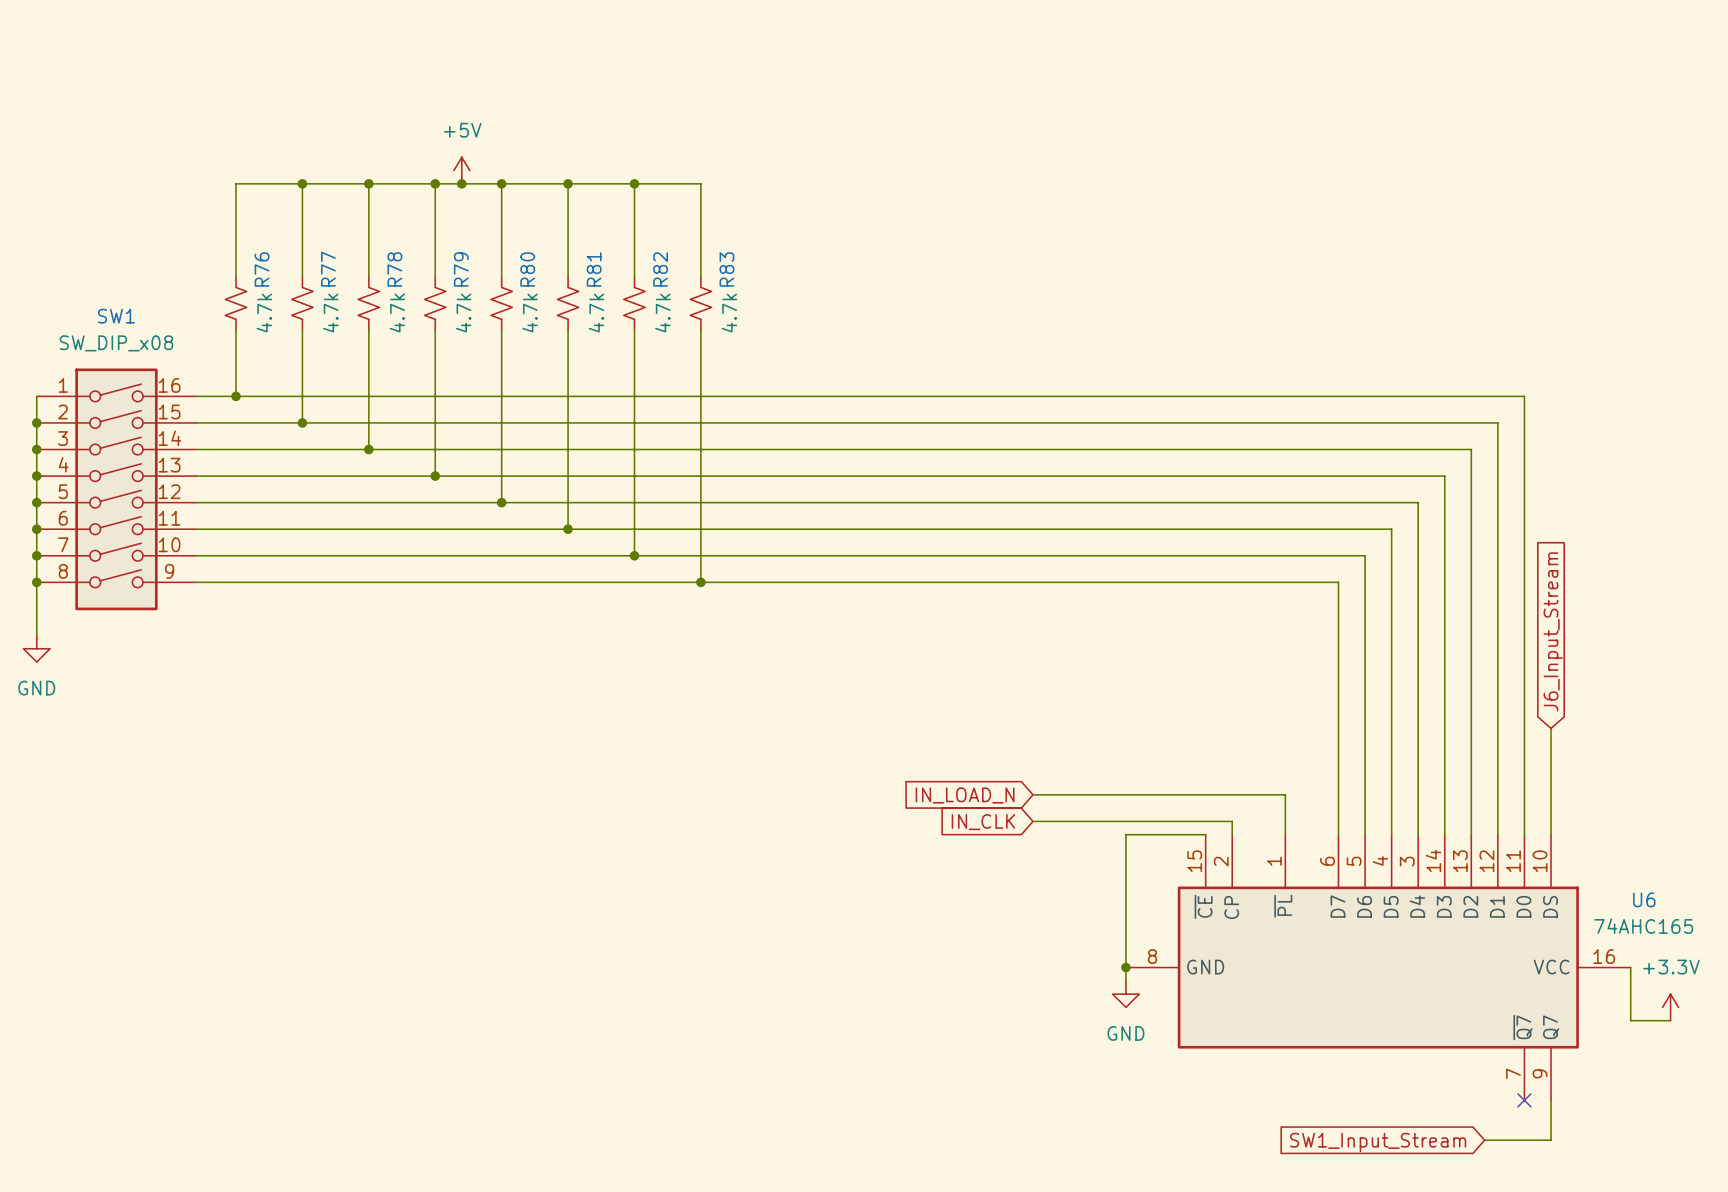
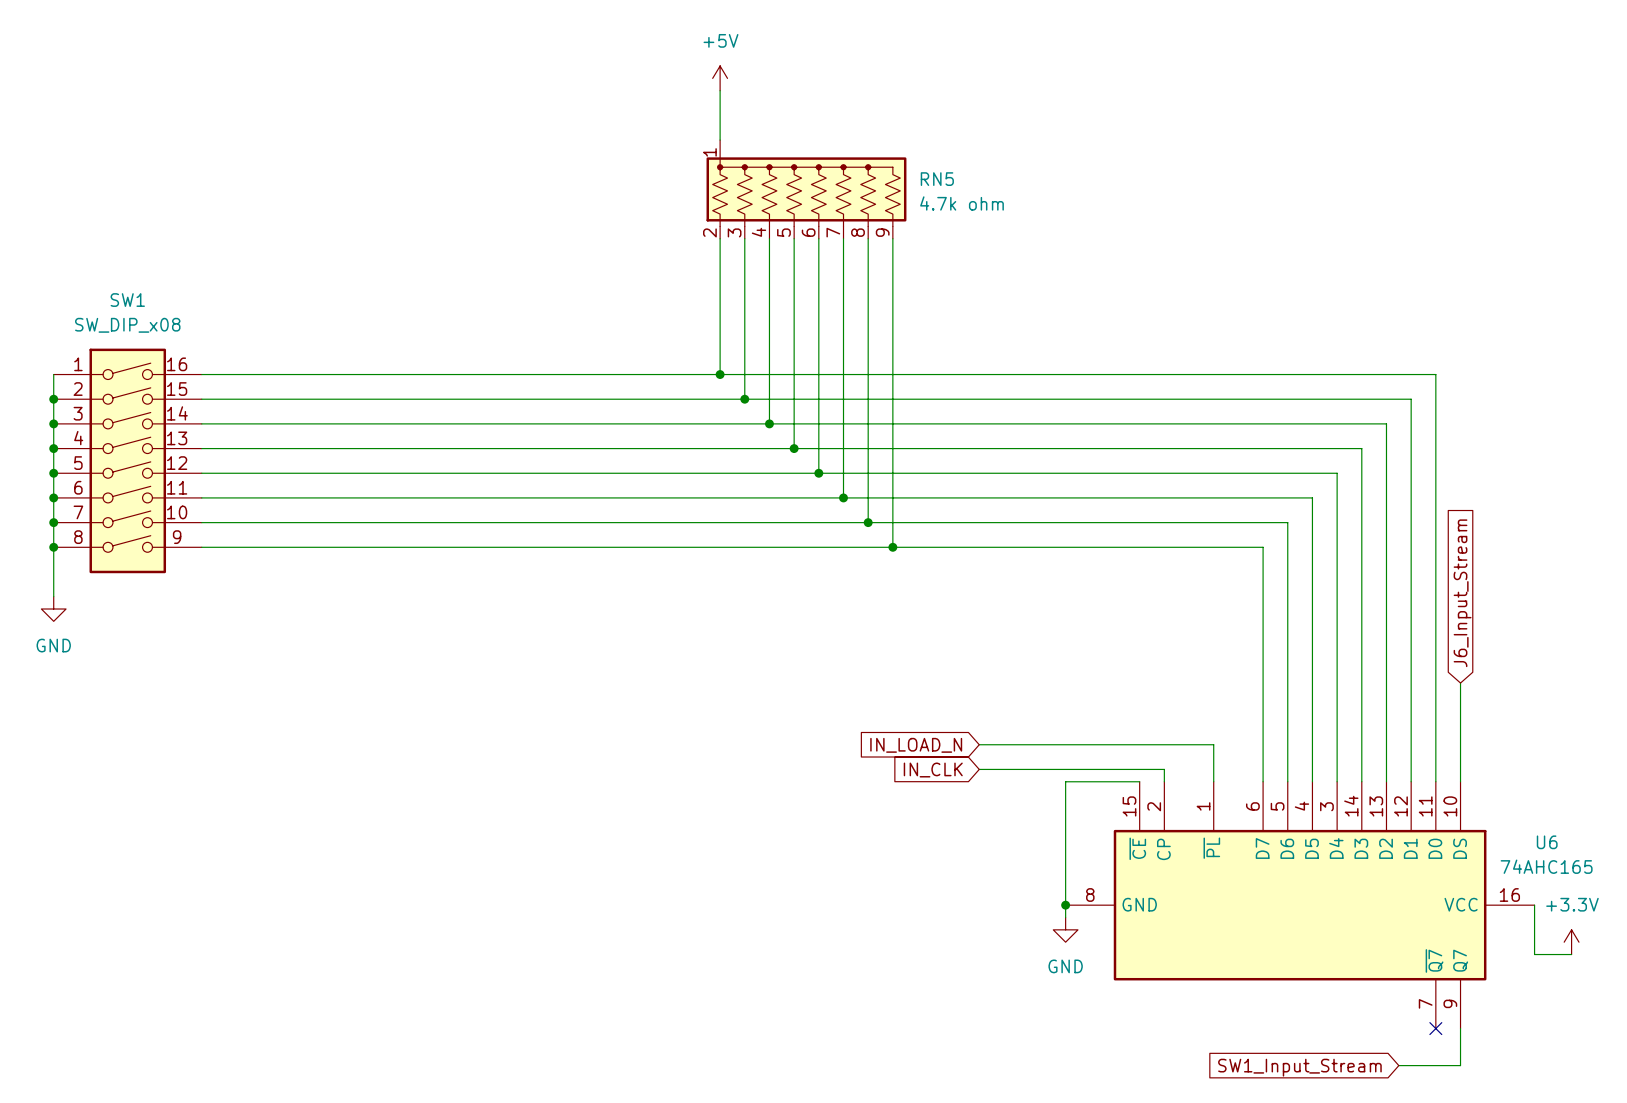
power symbol: none -> +5V (720, 78)
wire: none -> (720, 90) (720, 140)
power symbol: +5V (461, 170) -> none
wire: (302, 183) (302, 276) -> none
junction: (302, 183) -> none
wire: (368, 183) (368, 276) -> none
junction: (368, 183) -> none
wire: (435, 183) (435, 276) -> none
junction: (435, 183) -> none
junction: (461, 183) -> none
wire: (501, 183) (501, 276) -> none
junction: (501, 183) -> none
wire: (568, 183) (568, 276) -> none
junction: (568, 183) -> none
wire: (634, 183) (634, 276) -> none
junction: (634, 183) -> none
RN5: none -> 4.7k ohm (806, 189)
wire: none -> (720, 238) (720, 374)
wire: none -> (744, 238) (744, 399)
wire: none -> (843, 238) (843, 497)
wire: none -> (868, 238) (868, 522)
wire: none -> (892, 238) (892, 547)
wire: (236, 276) (236, 183) (700, 183) (700, 276) -> none
R76: 4.7k (236, 303) -> none
R77: 4.7k (302, 303) -> none
R78: 4.7k (368, 303) -> none
R79: 4.7k (435, 303) -> none
R80: 4.7k (501, 303) -> none
R81: 4.7k (568, 303) -> none
R82: 4.7k (634, 303) -> none
R83: 4.7k (700, 303) -> none
wire: (236, 329) (236, 396) -> none
wire: (302, 329) (302, 422) -> none
wire: (368, 329) (368, 449) -> none
wire: (435, 329) (435, 476) -> none
wire: (501, 329) (501, 502) -> none
wire: (568, 329) (568, 529) -> (769, 238) (769, 423)
wire: (634, 329) (634, 555) -> (794, 238) (794, 448)
wire: (700, 329) (700, 582) -> (818, 238) (818, 473)
junction: (236, 396) -> none
junction: none -> (720, 374)
junction: (302, 422) -> none
junction: none -> (744, 399)
junction: (368, 449) -> none
junction: none -> (769, 423)
junction: (435, 476) -> none
junction: none -> (794, 448)
junction: (501, 502) -> none
junction: none -> (818, 473)
junction: (568, 529) -> none
junction: none -> (843, 497)
junction: (634, 555) -> none
junction: none -> (868, 522)
junction: (700, 582) -> none
junction: none -> (892, 547)

